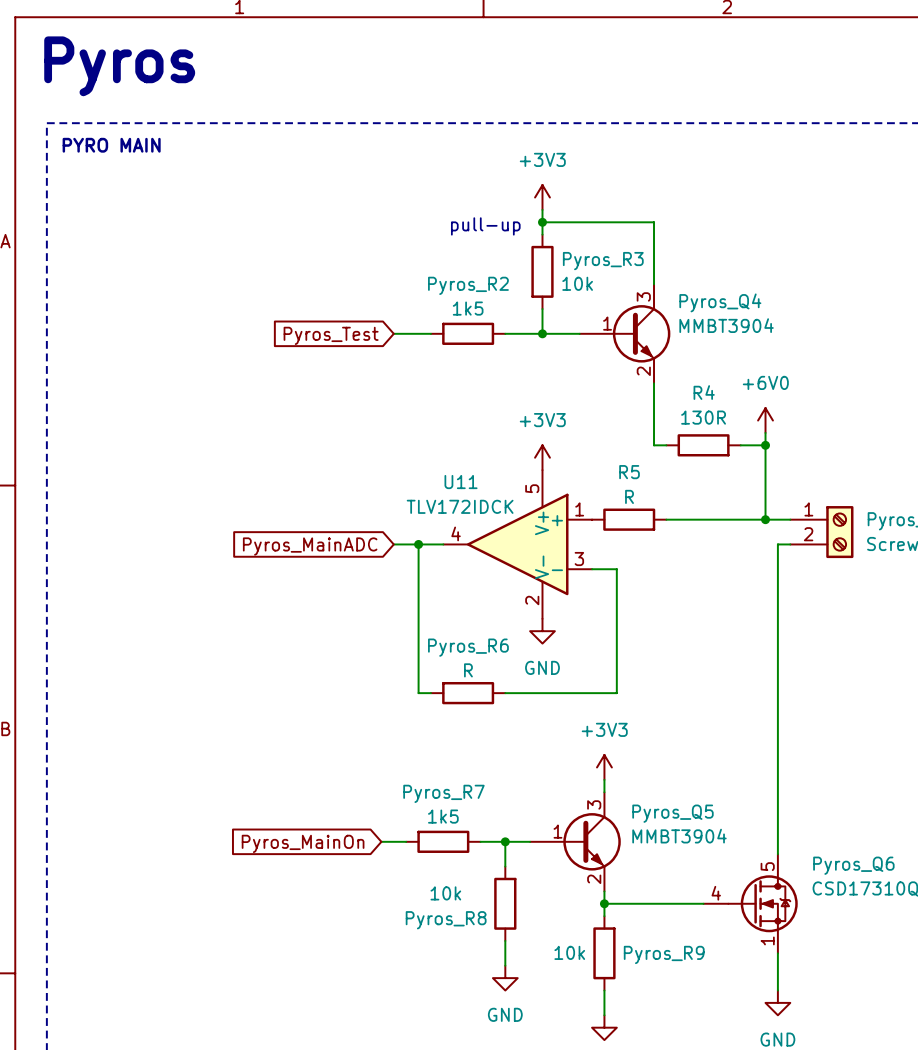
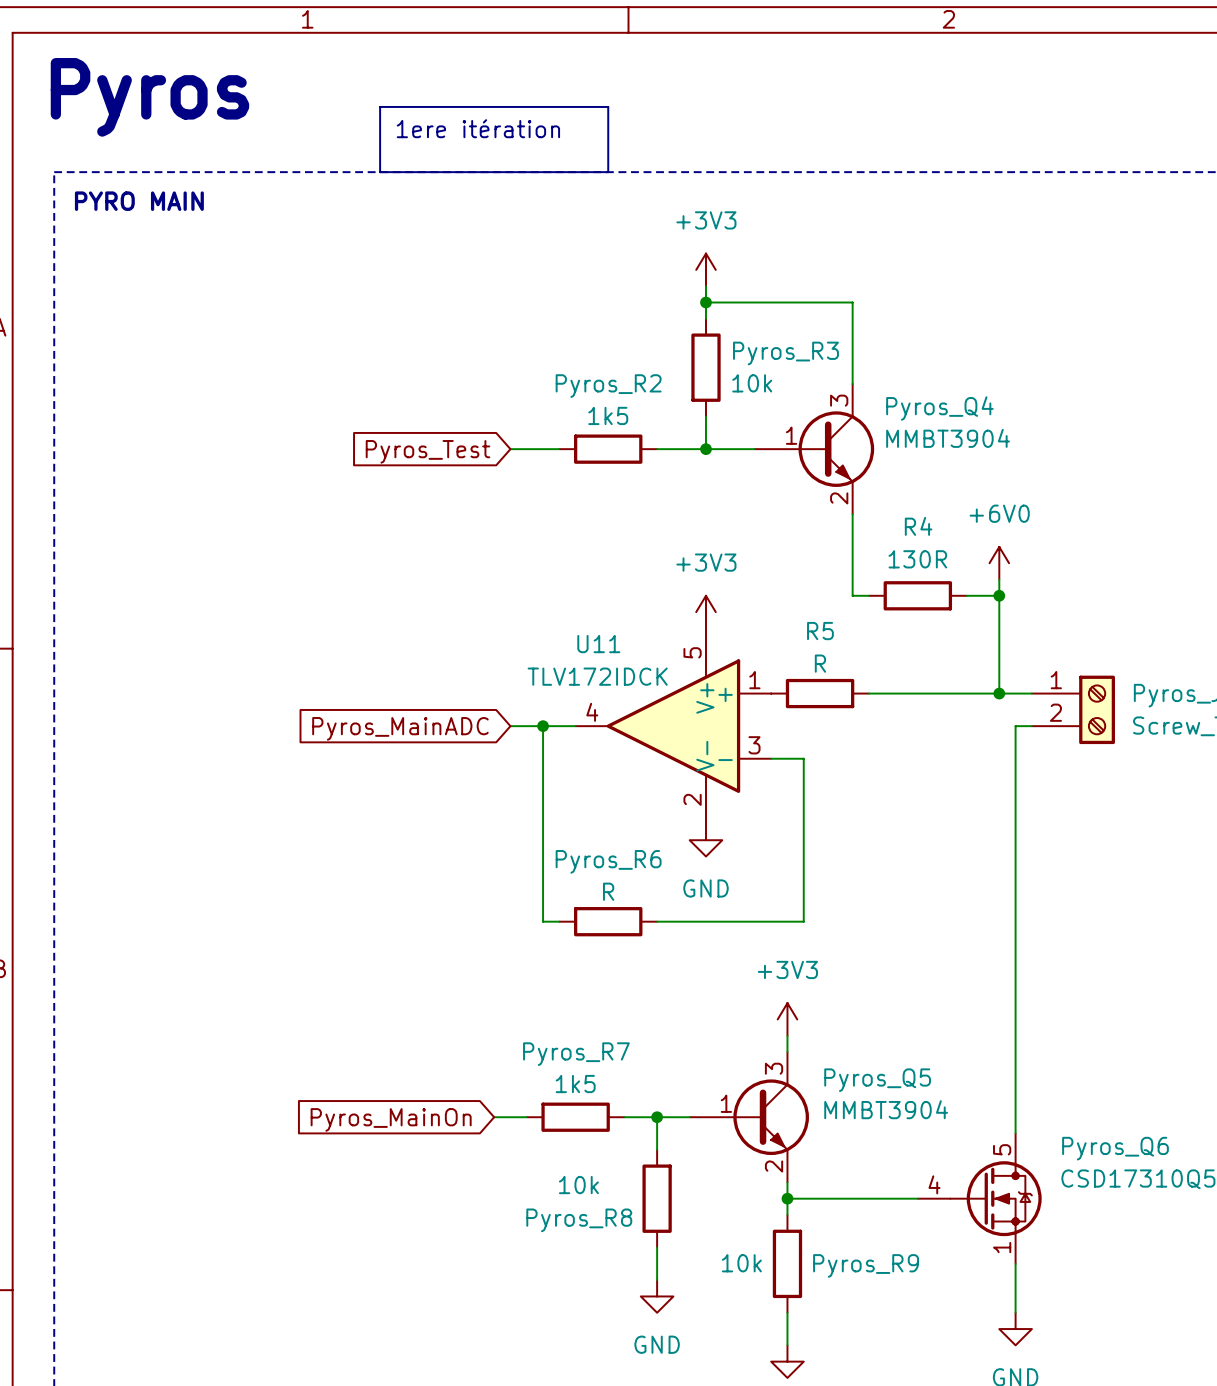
line: none -> (380, 106) (608, 106) (608, 172) (380, 172) (380, 106)
text: none -> 1ere itération (478, 128)
text: pull-up (485, 226) -> none

